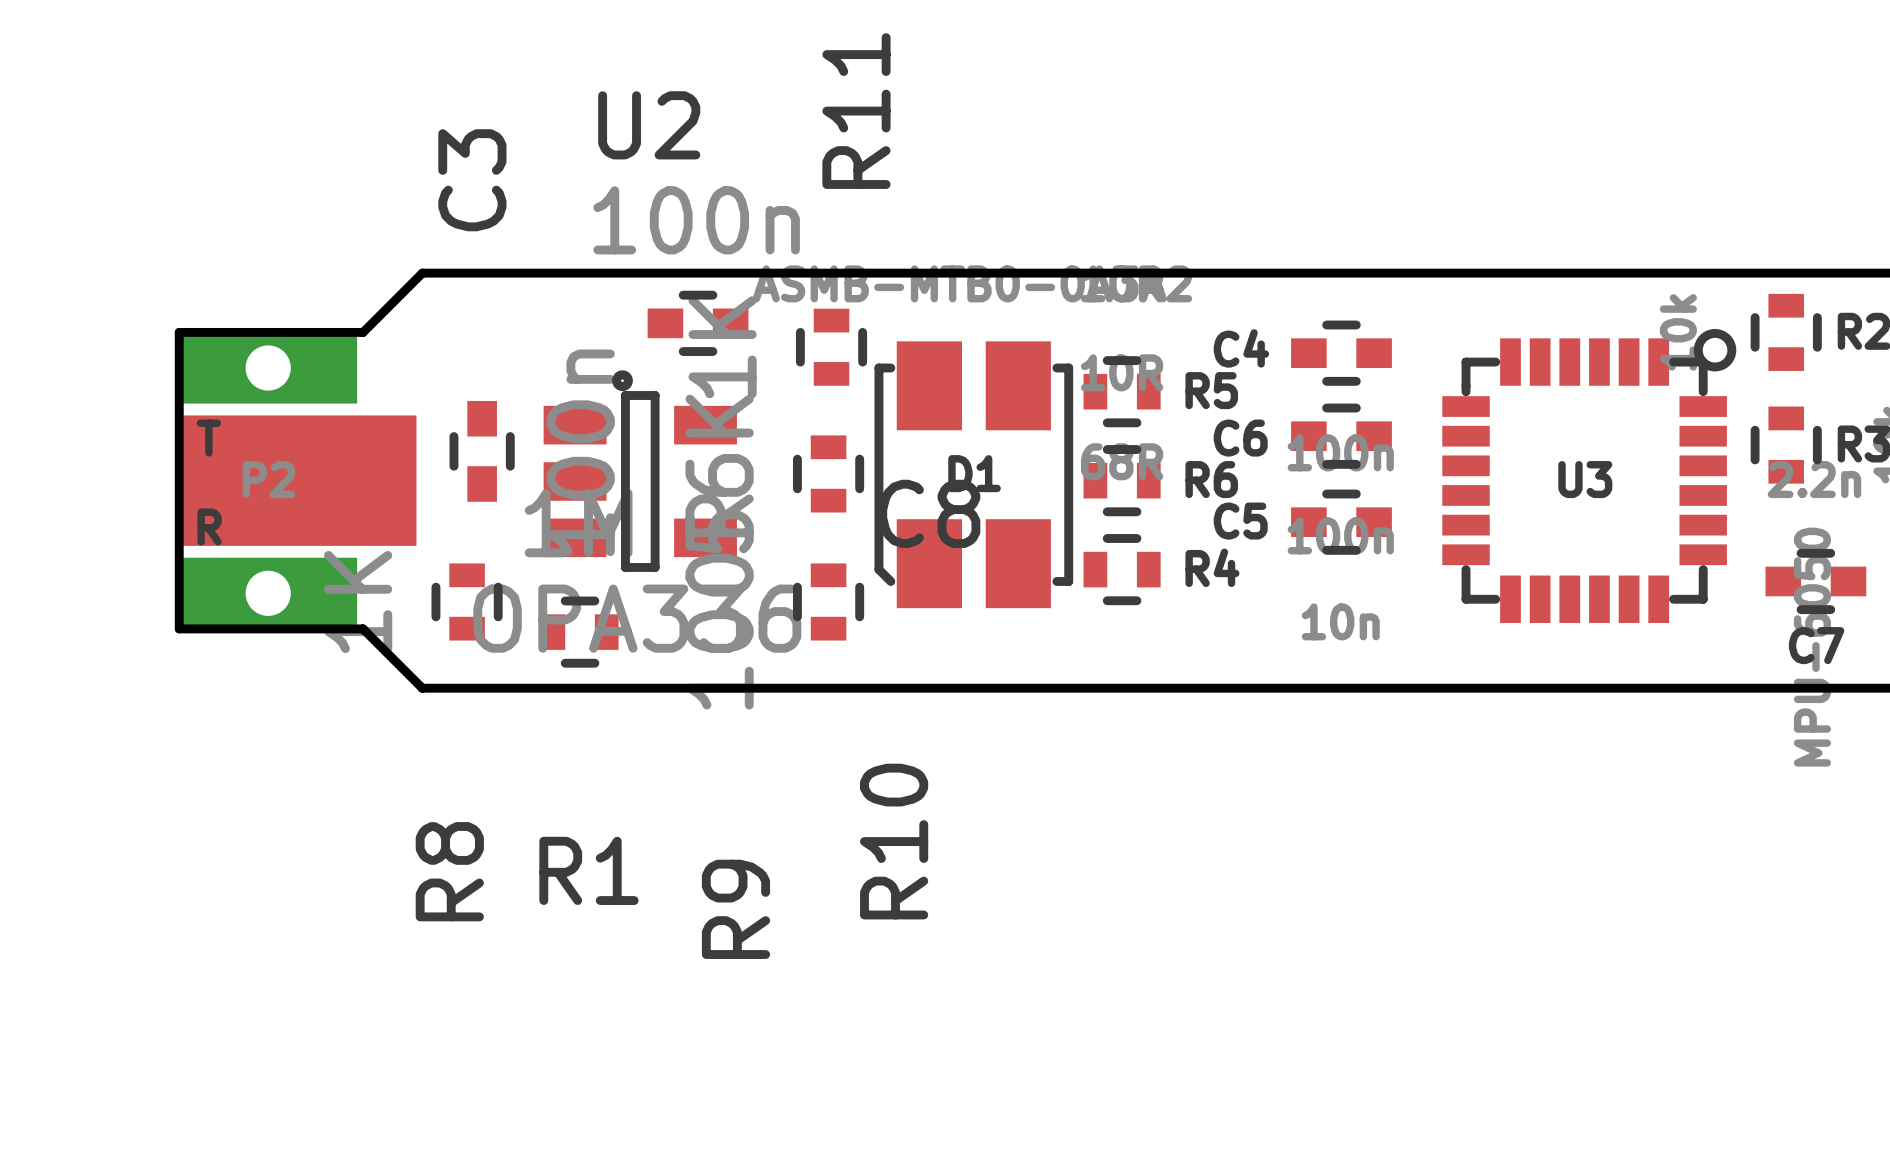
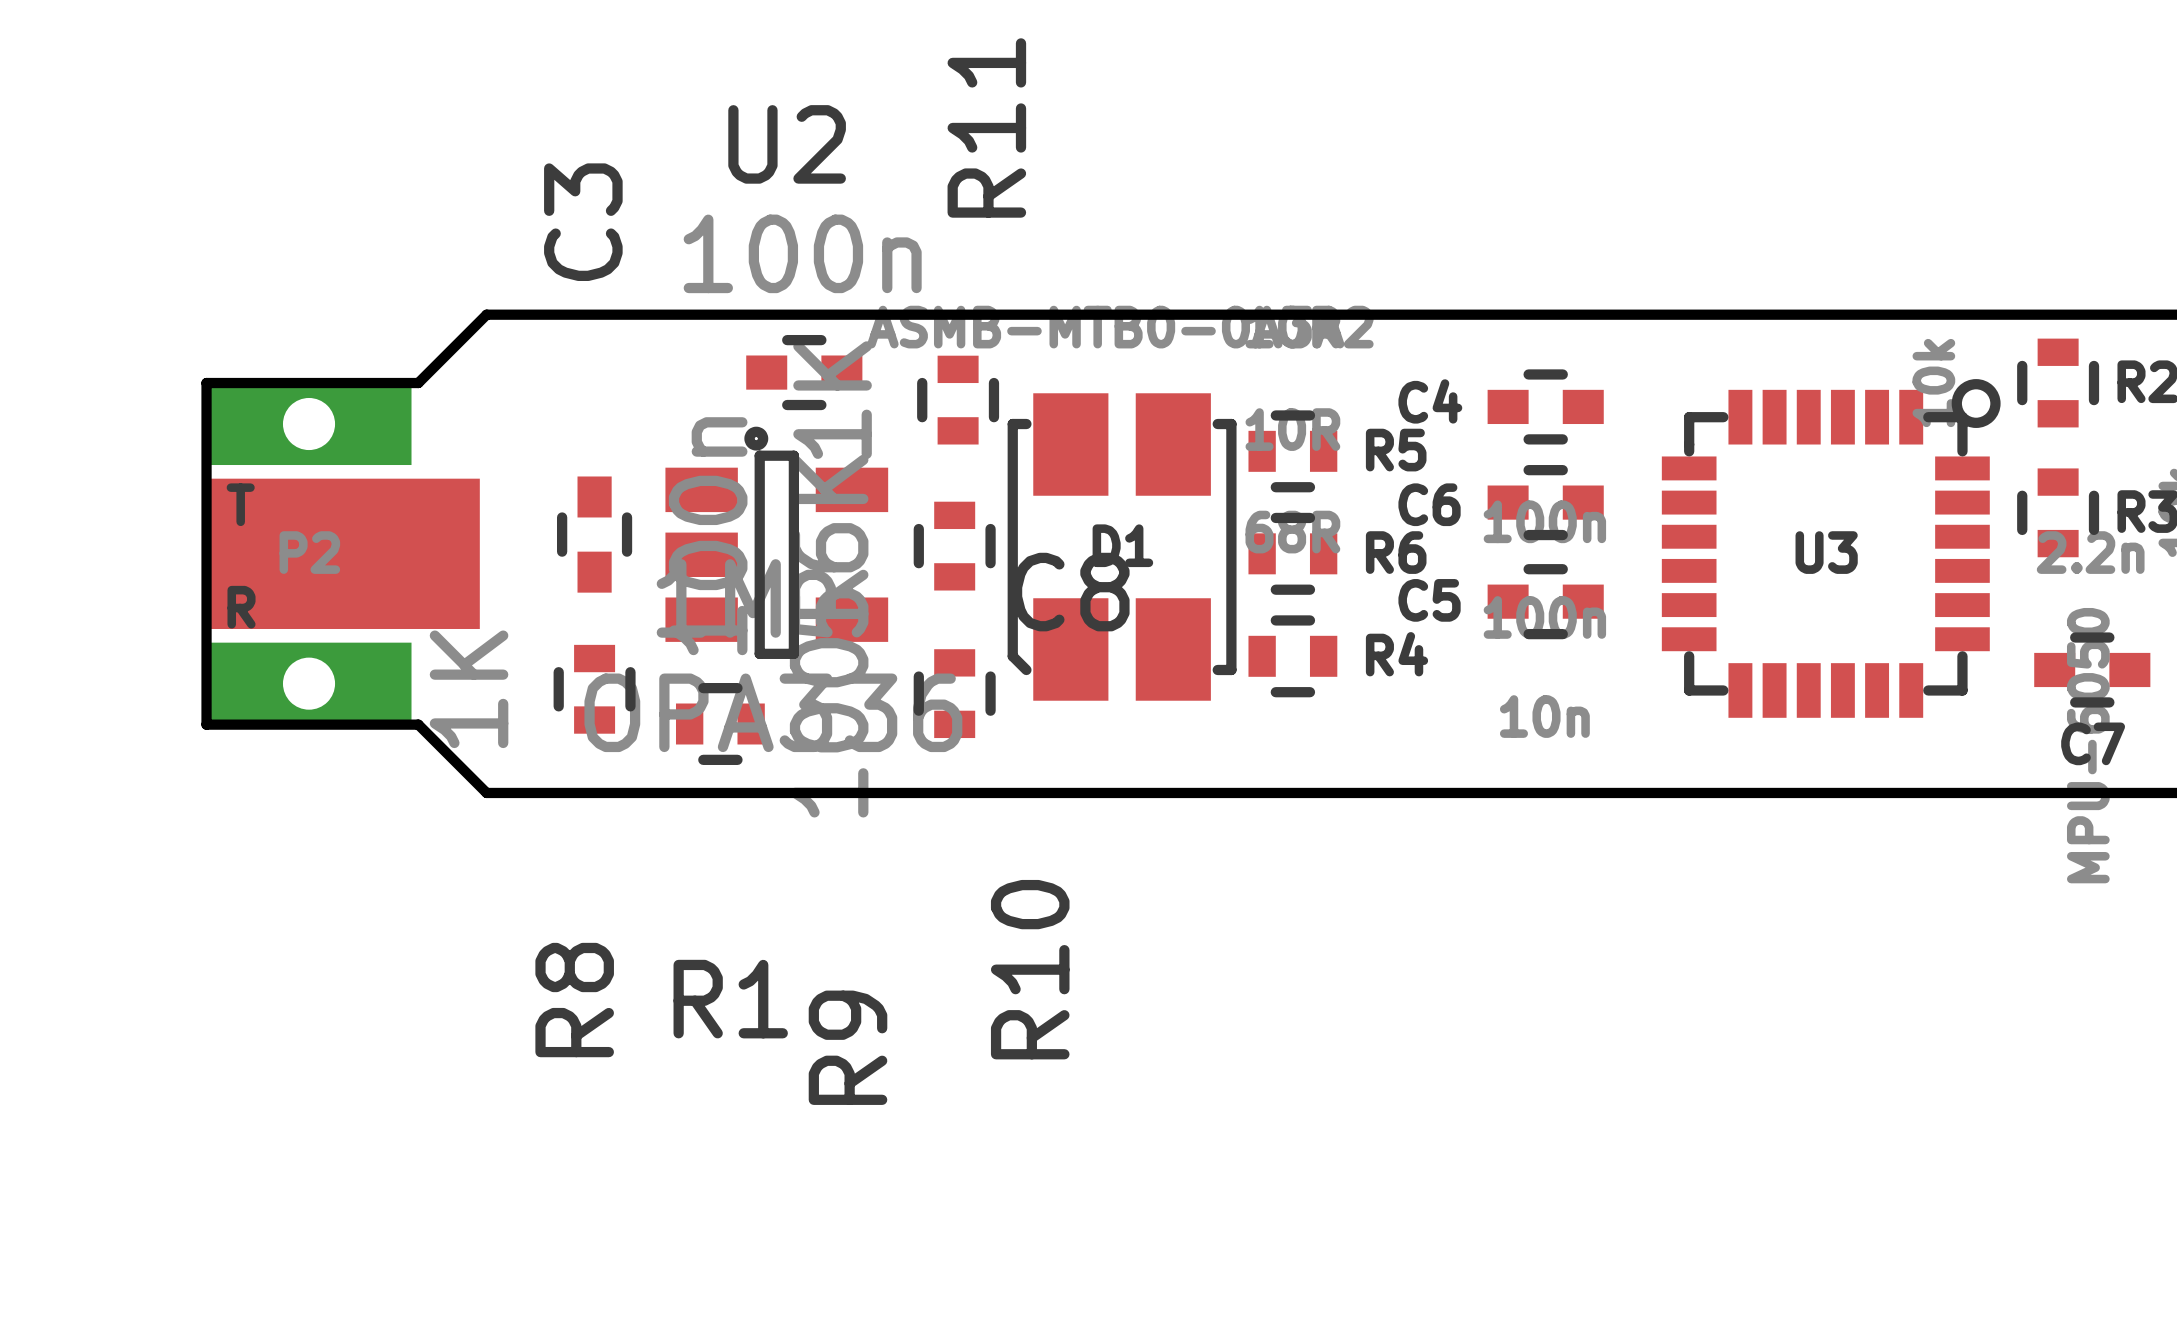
C3 position: (482, 451) -> (594, 534)
U2 position: (640, 471) -> (776, 542)
R8 position: (467, 601) -> (594, 689)
R1 position: (580, 632) -> (720, 723)

